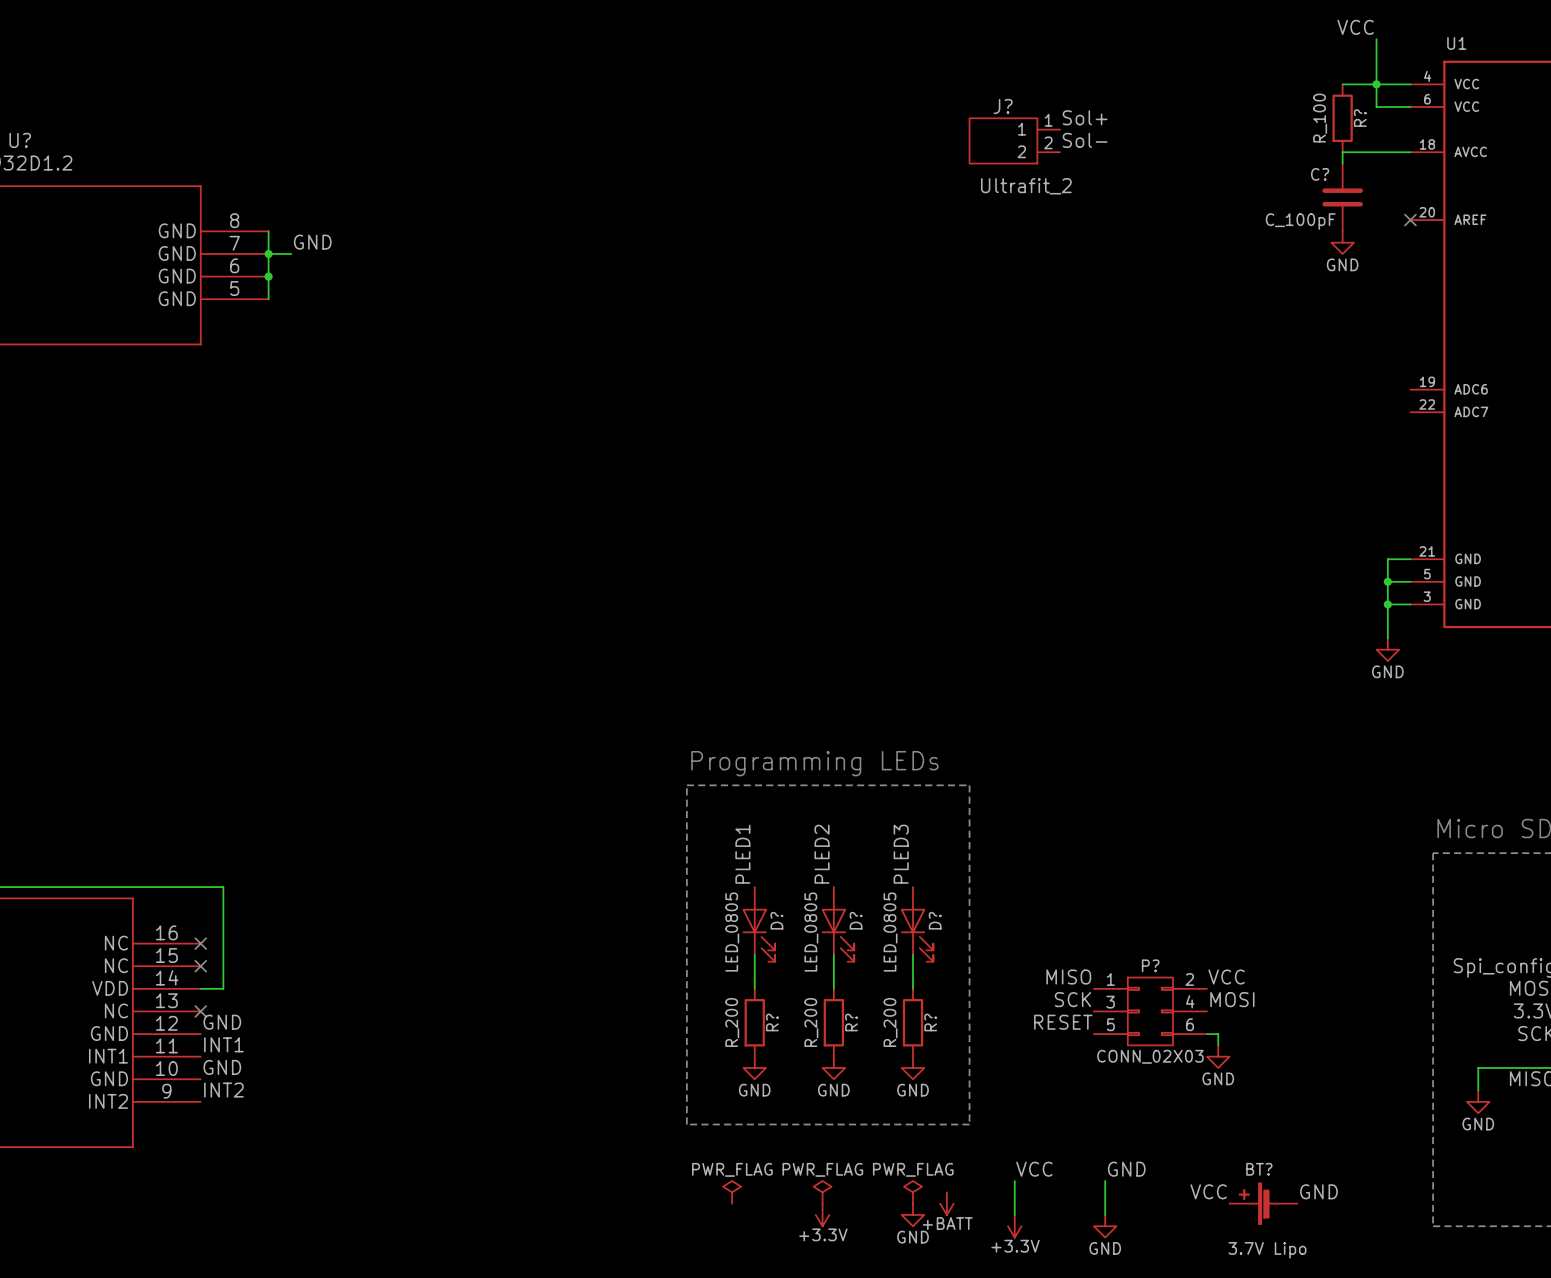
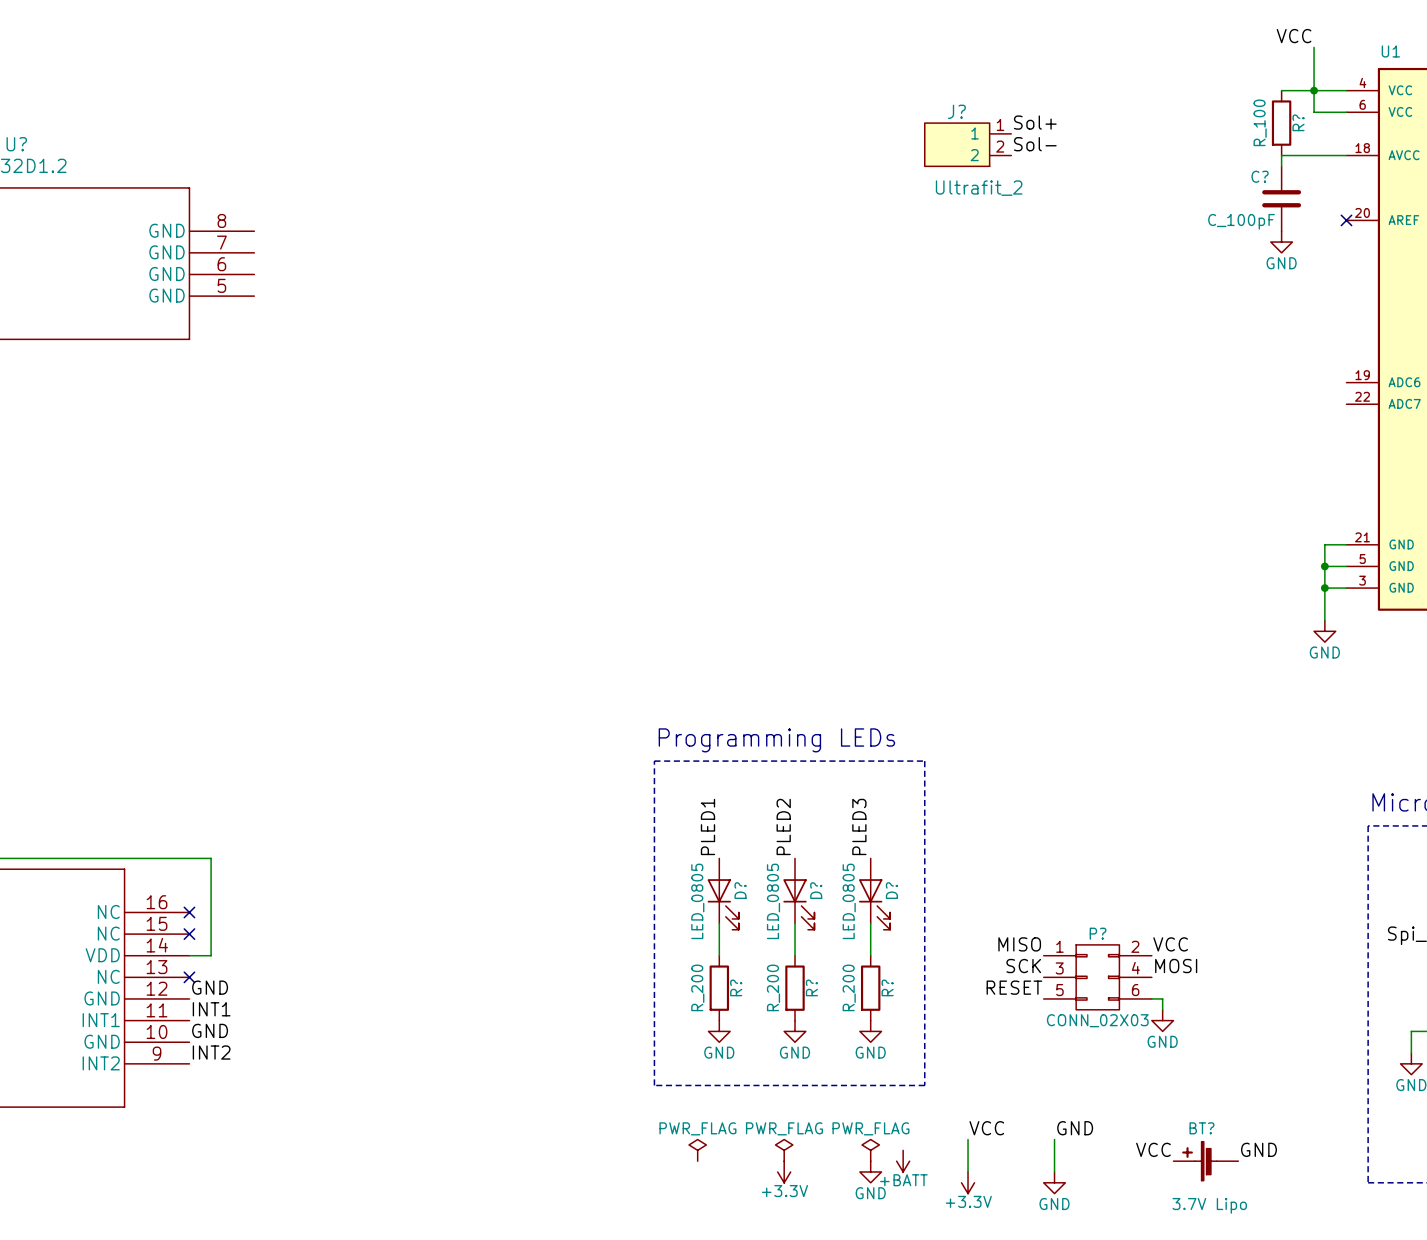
wire: (268, 231) (268, 299) -> none
label: GND (312, 242) -> none
wire: (268, 253) (291, 253) -> none
junction: (268, 253) -> none
junction: (268, 276) -> none

